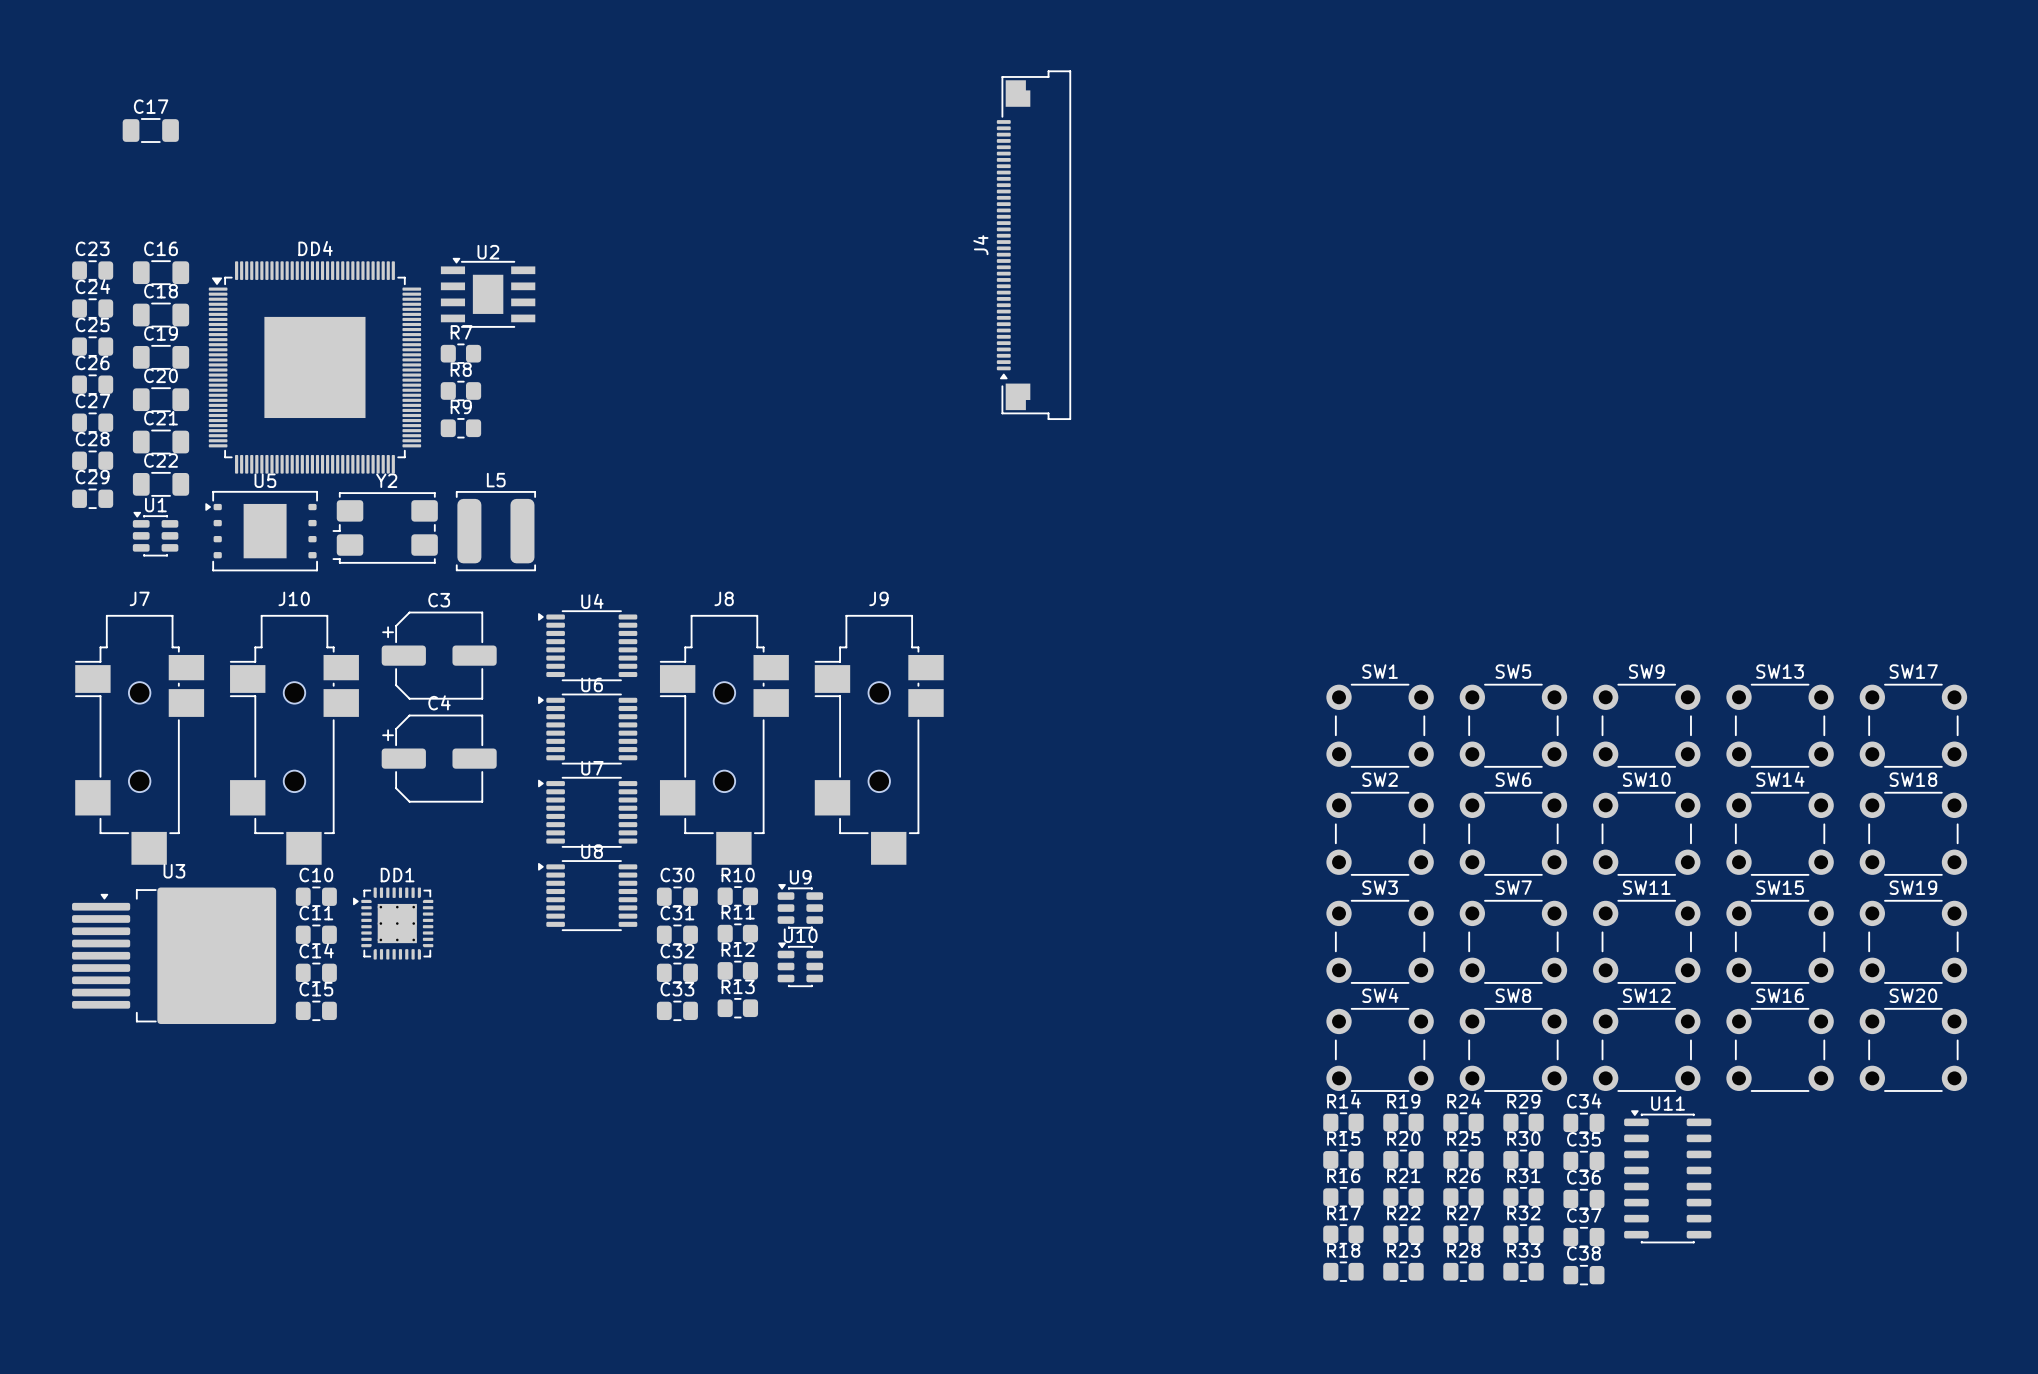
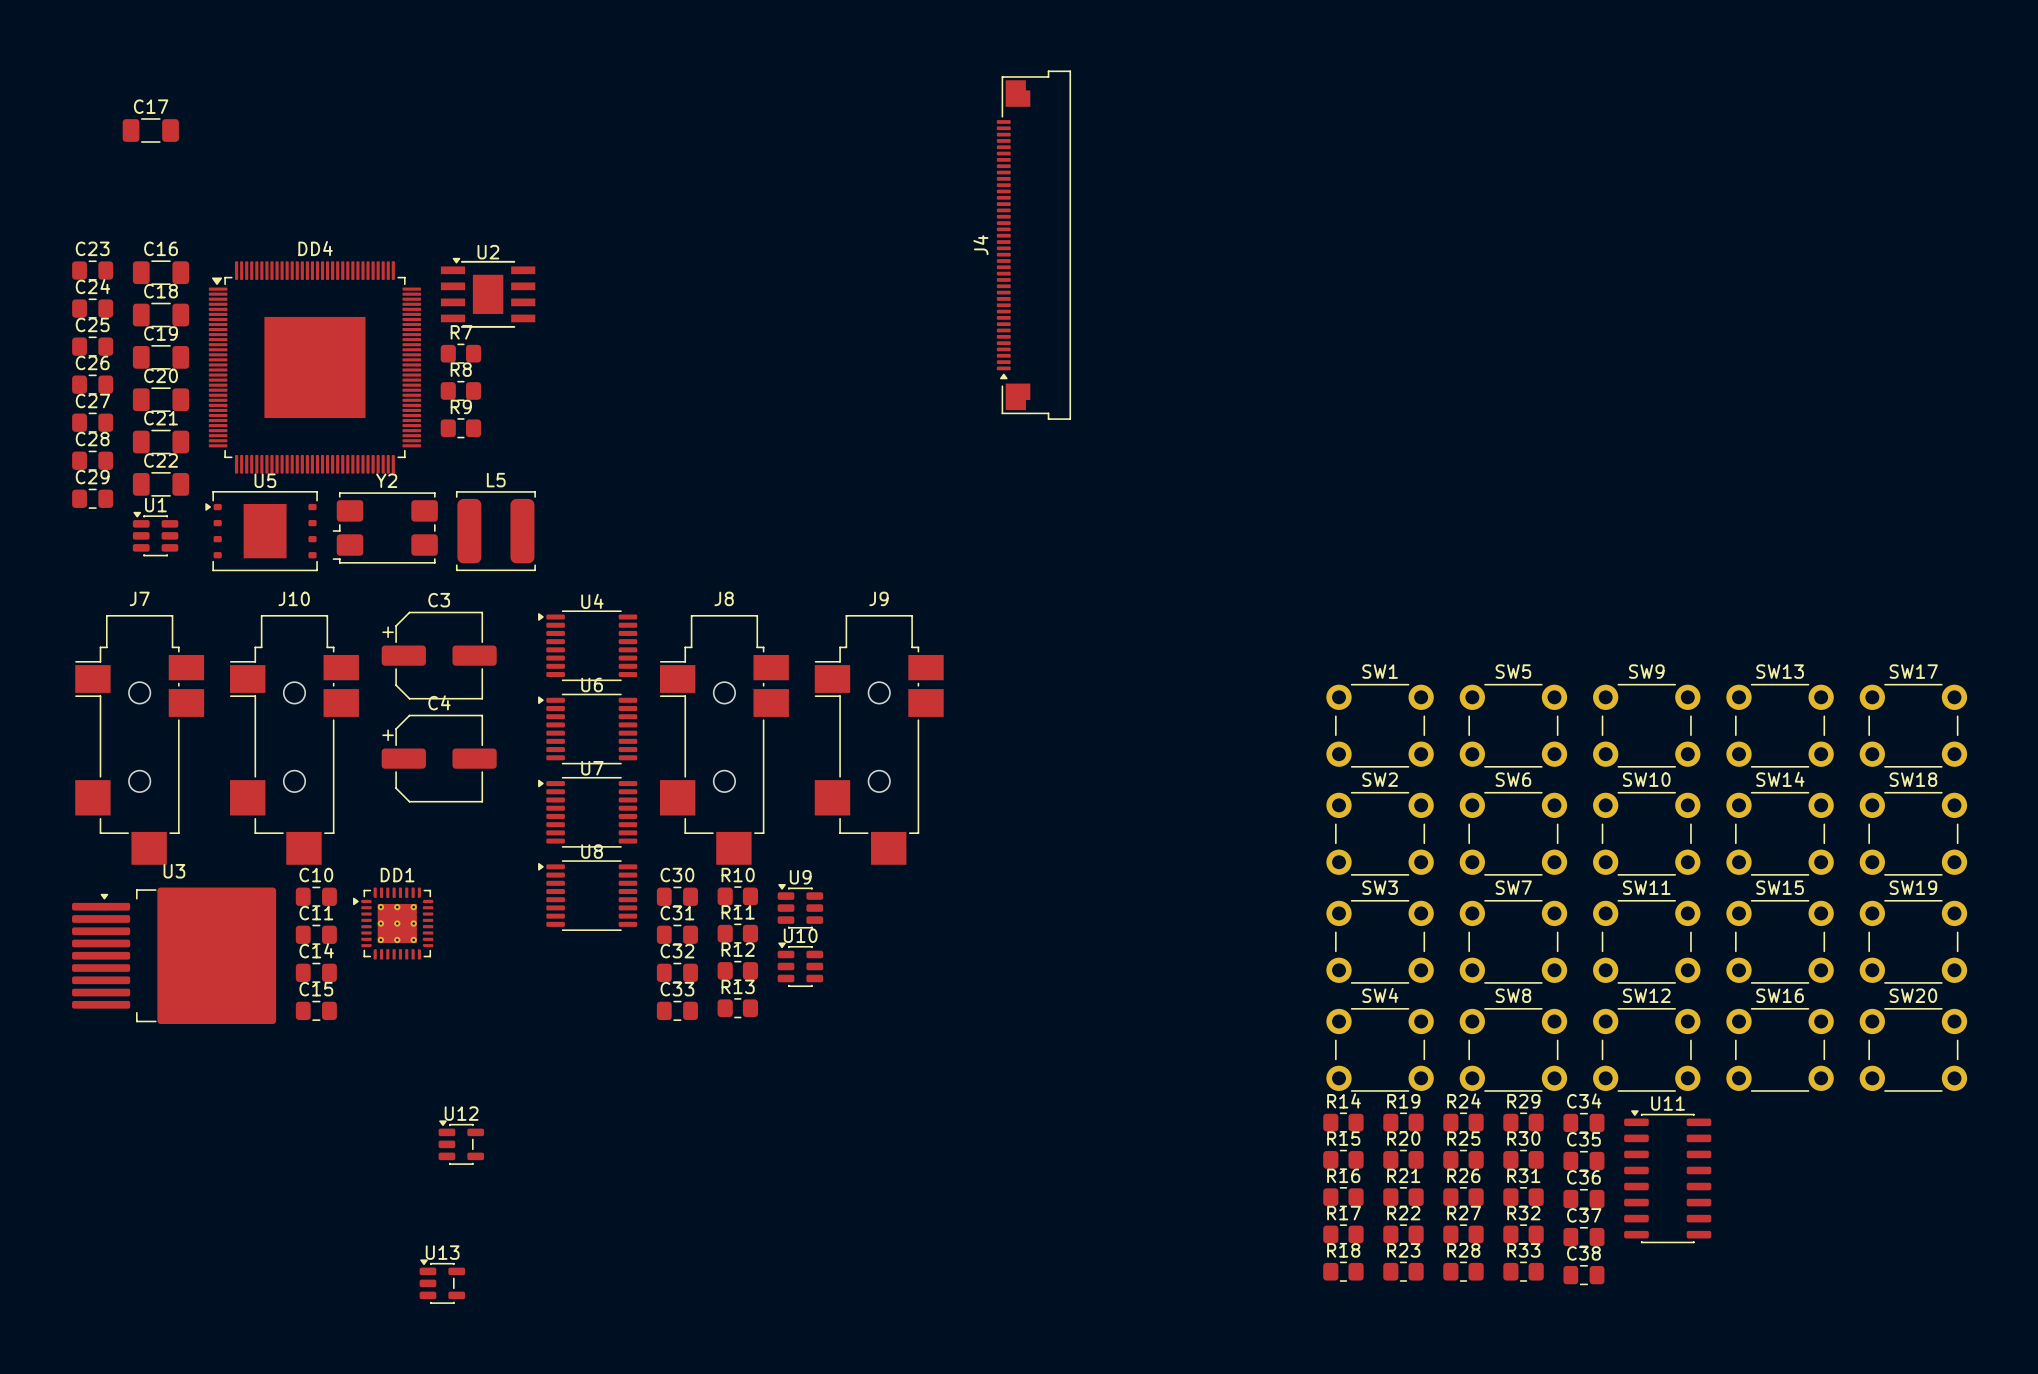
U12: none -> (461, 1142)
U13: none -> (442, 1281)

